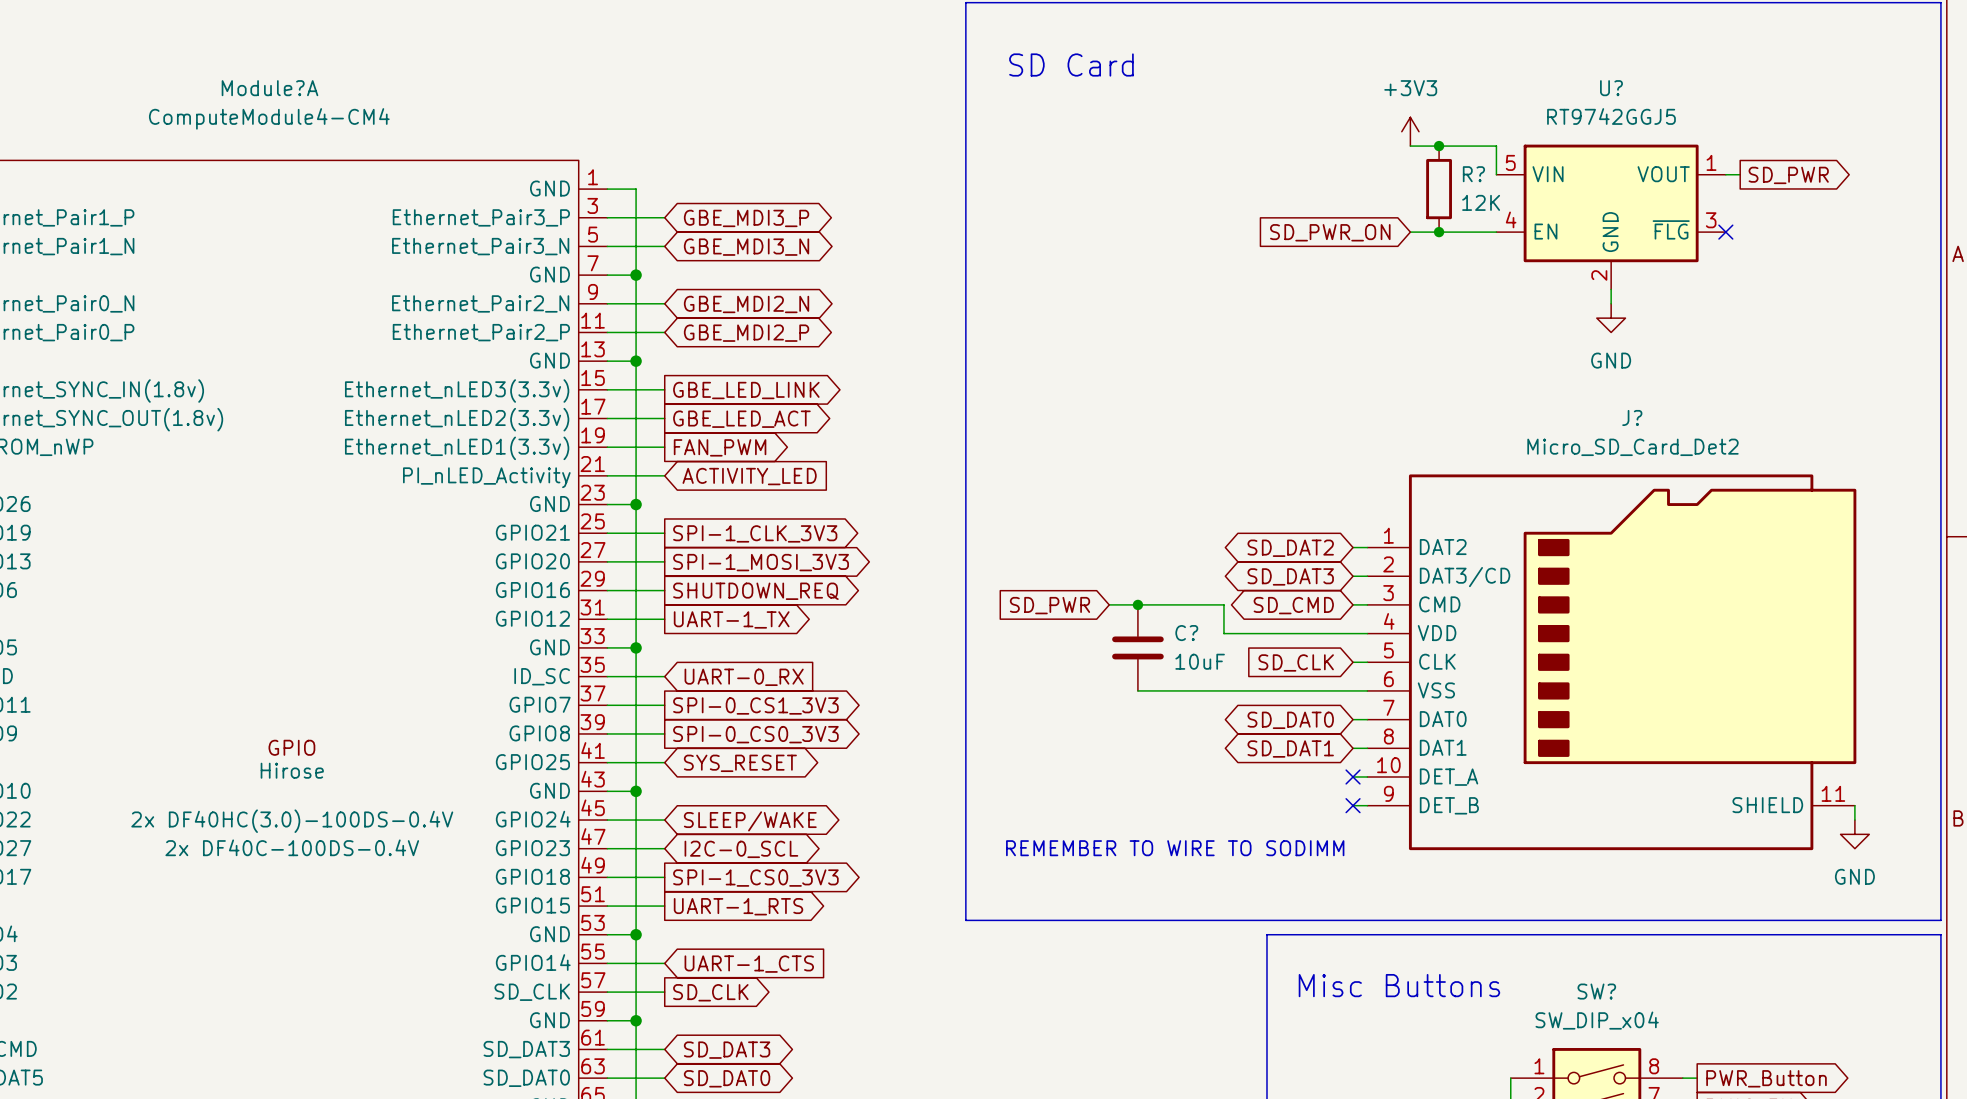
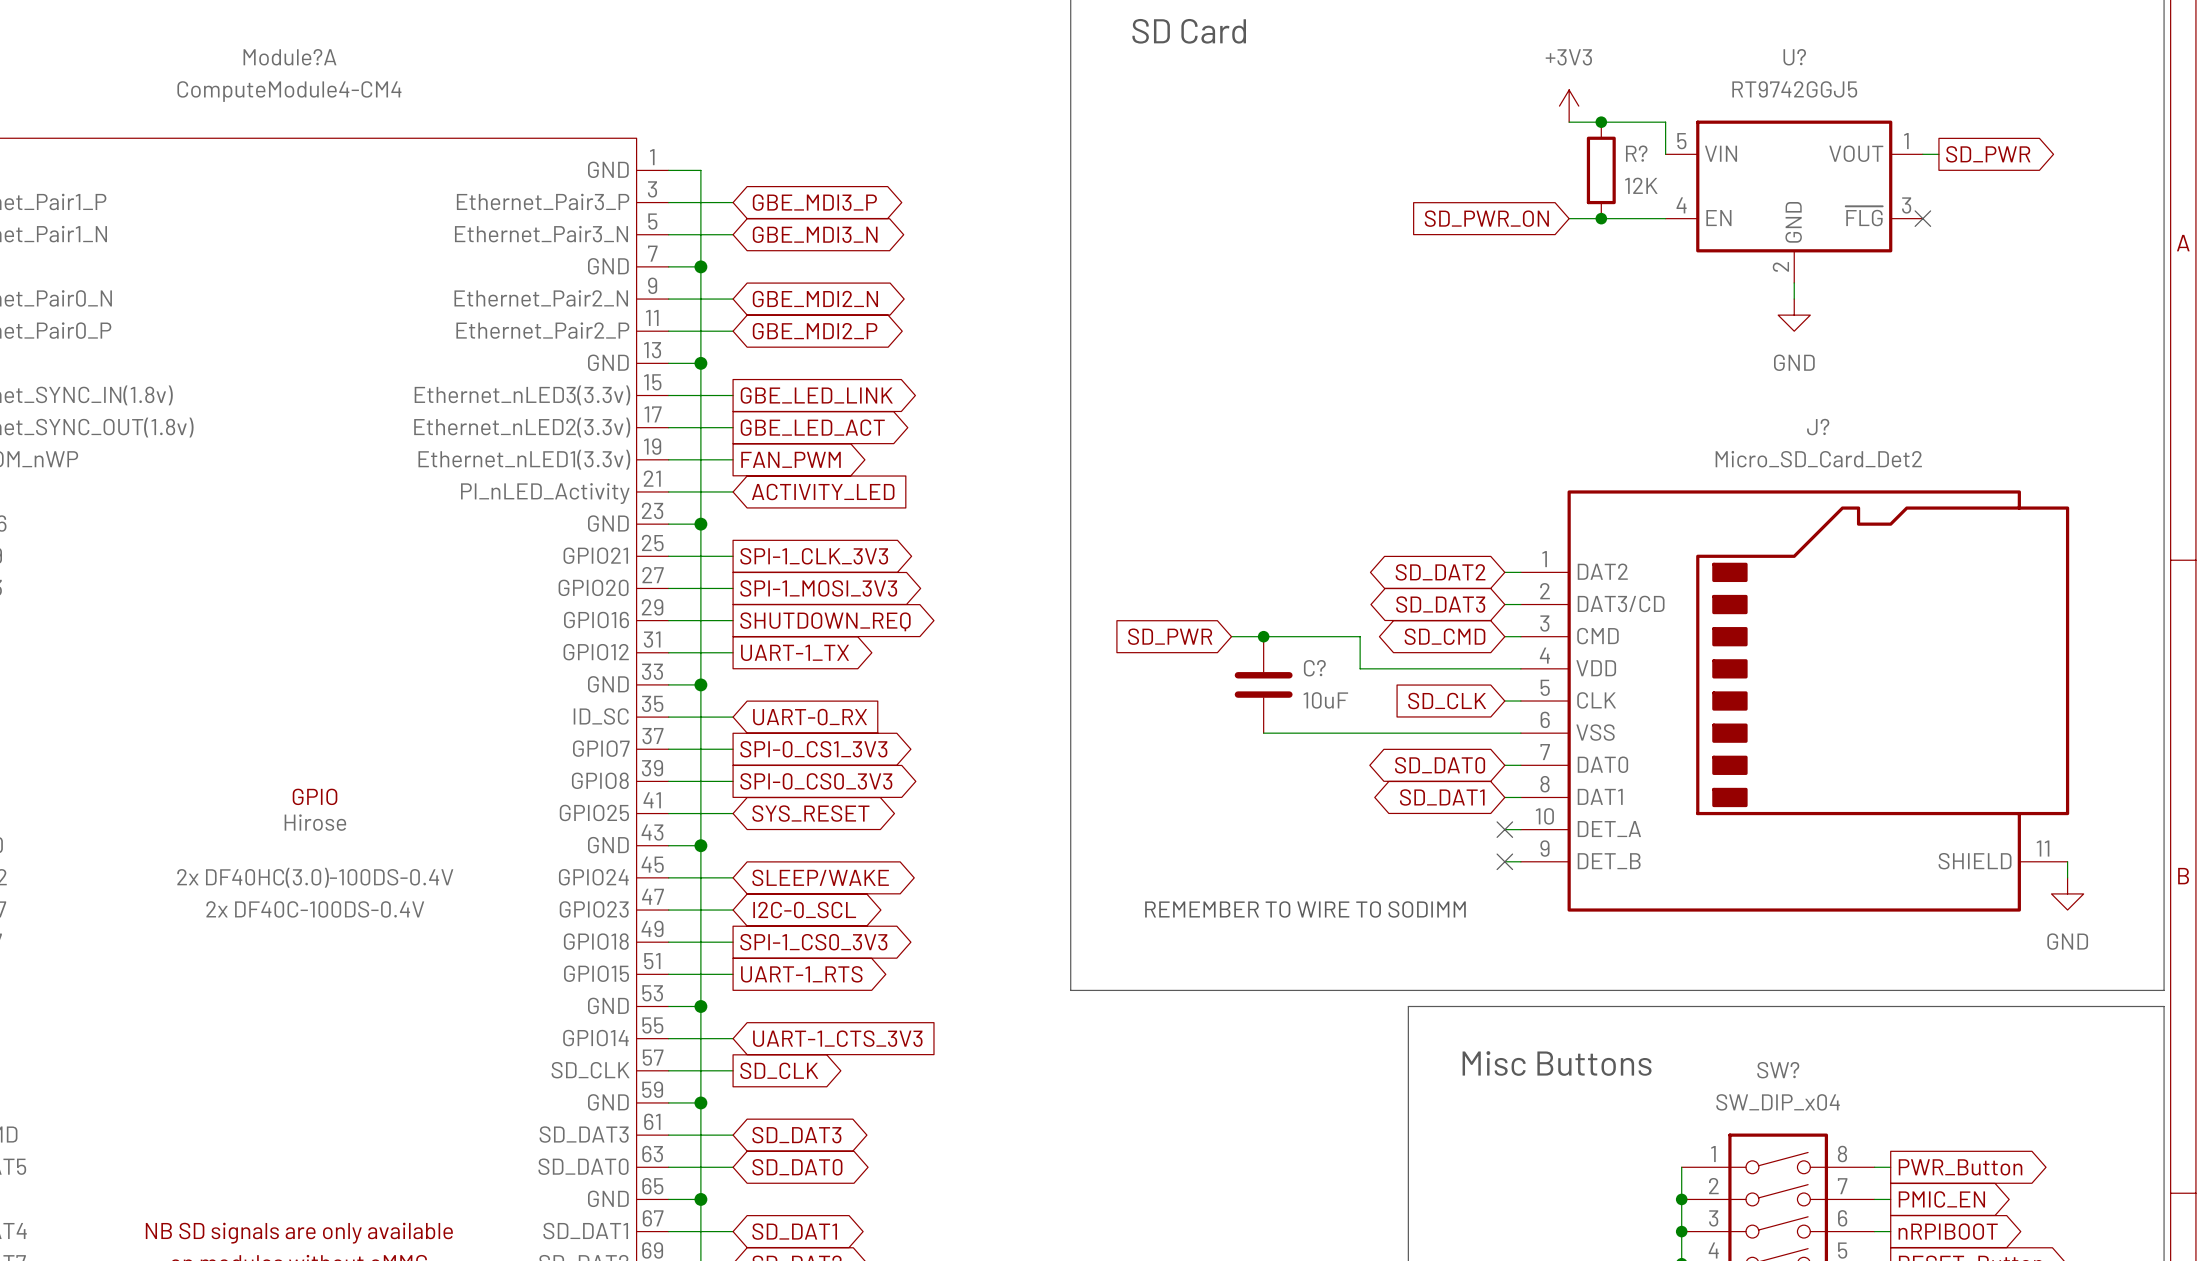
global label: UART-1_CTS (749, 964) -> UART-1_CTS_3V3 (837, 1038)

